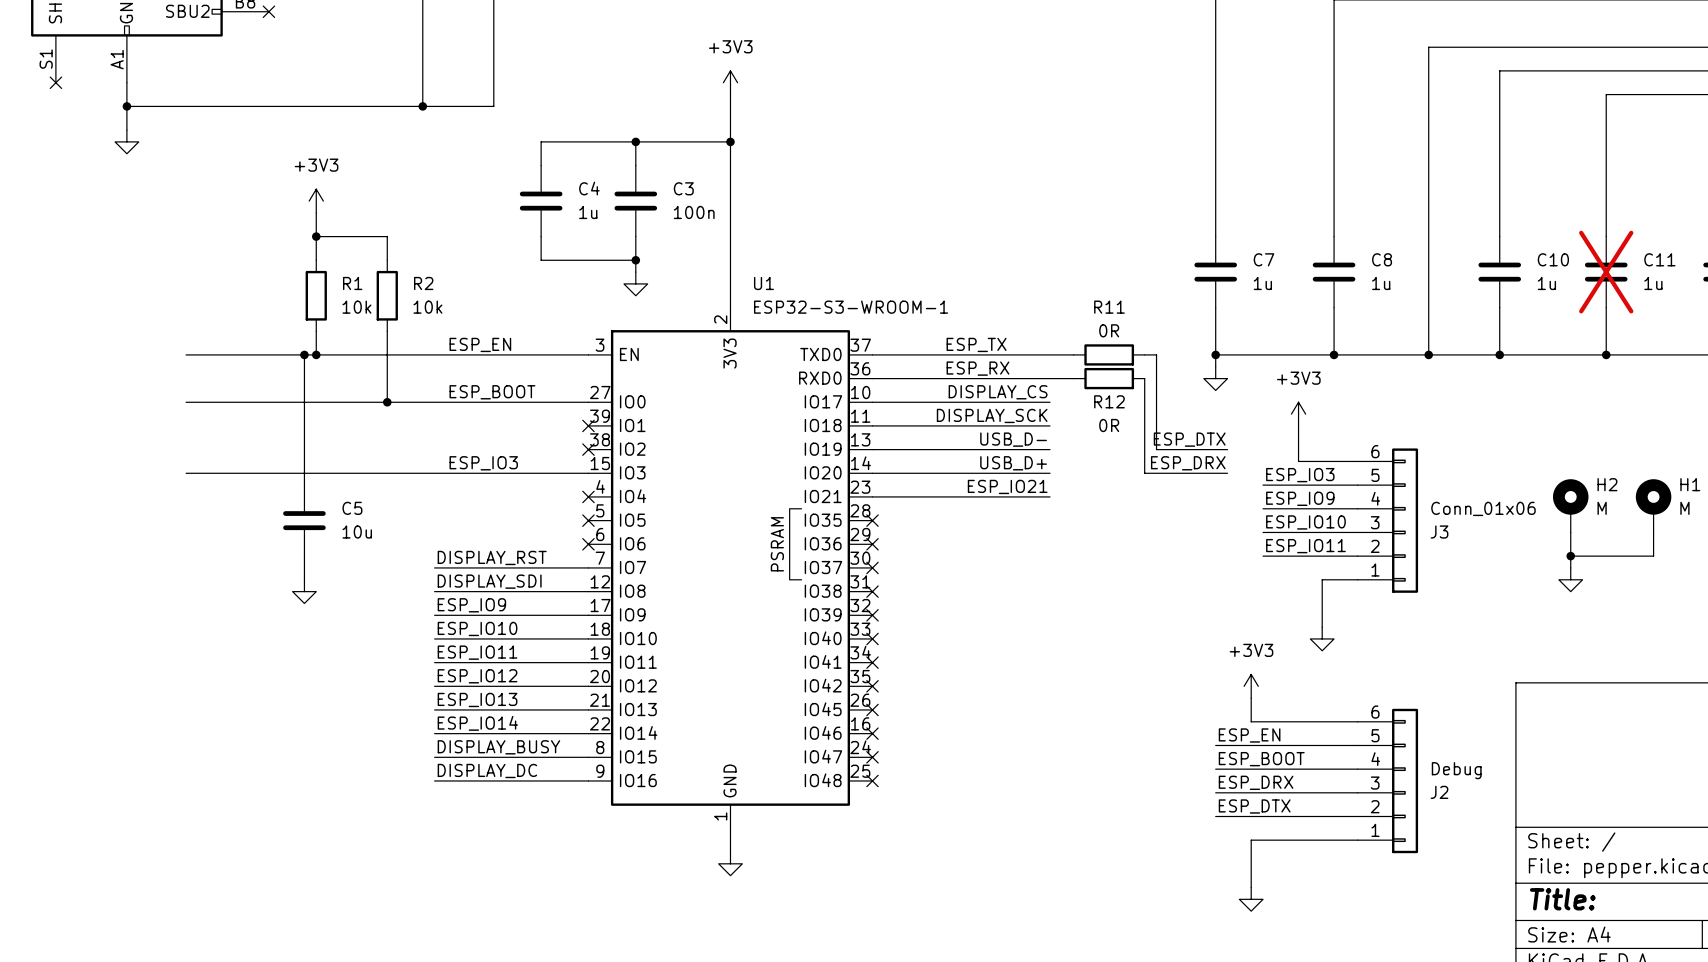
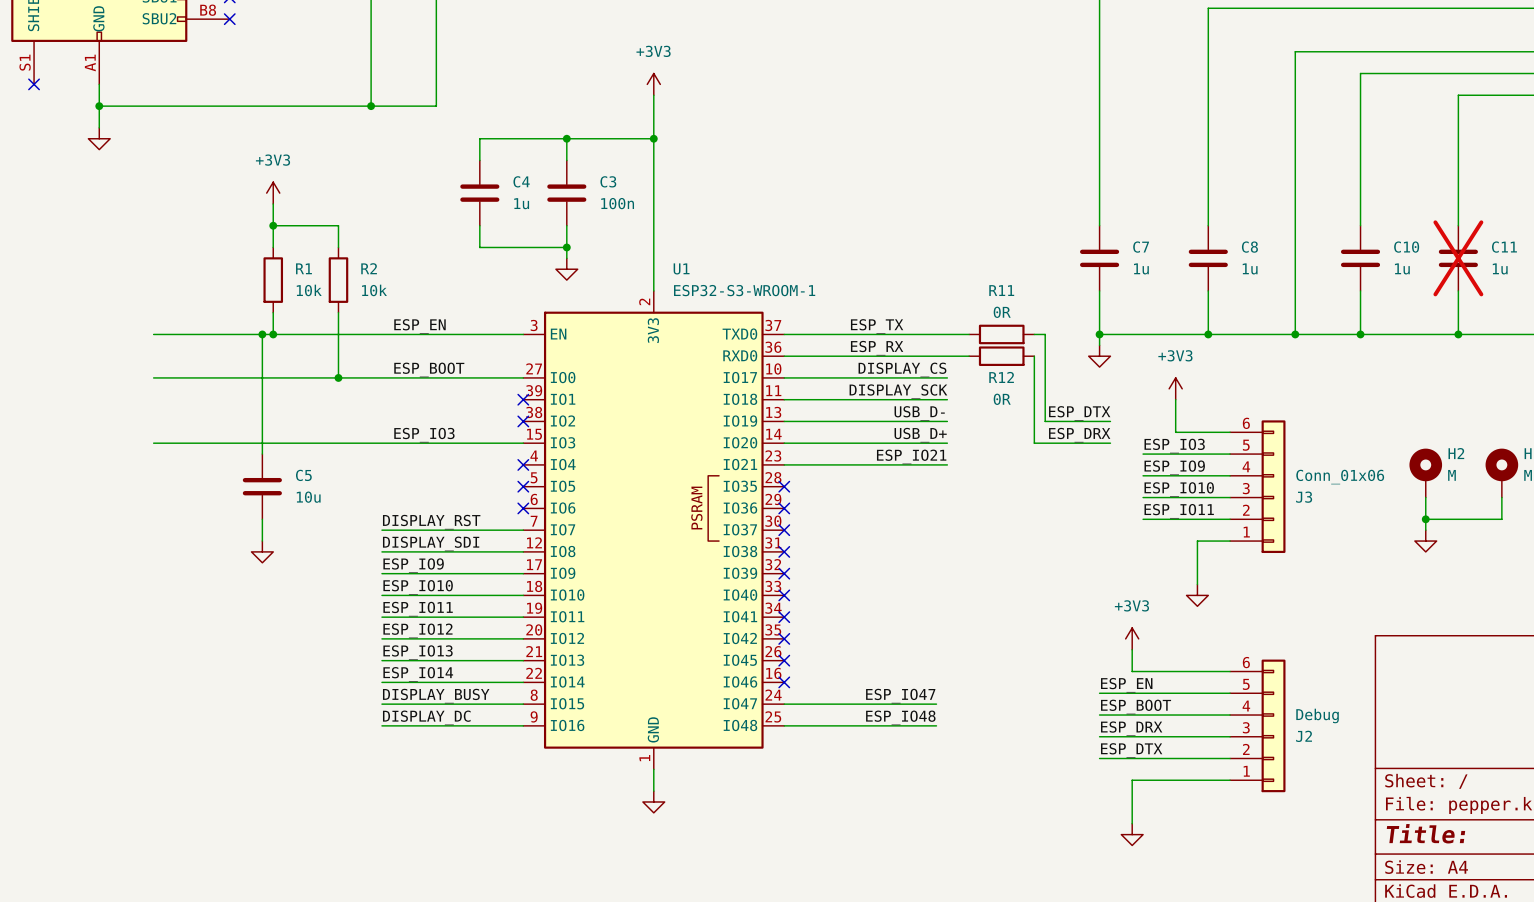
label: none -> ESP_IO47 (900, 696)
wire: none -> (784, 704) (936, 704)
no-connect mark: (872, 757) -> none
label: none -> ESP_IO48 (900, 717)
wire: none -> (784, 725) (936, 725)
no-connect mark: (872, 780) -> none

